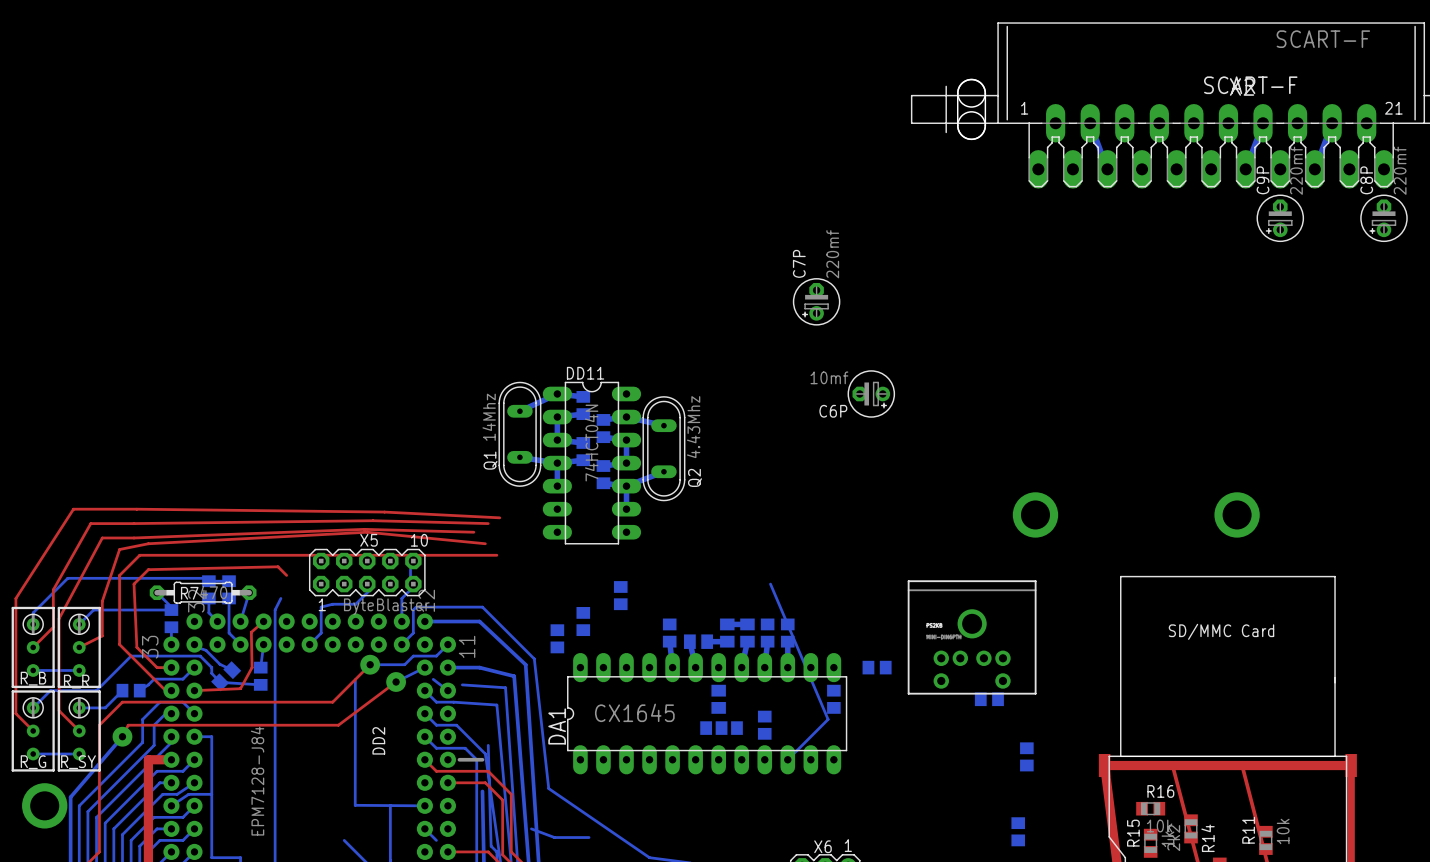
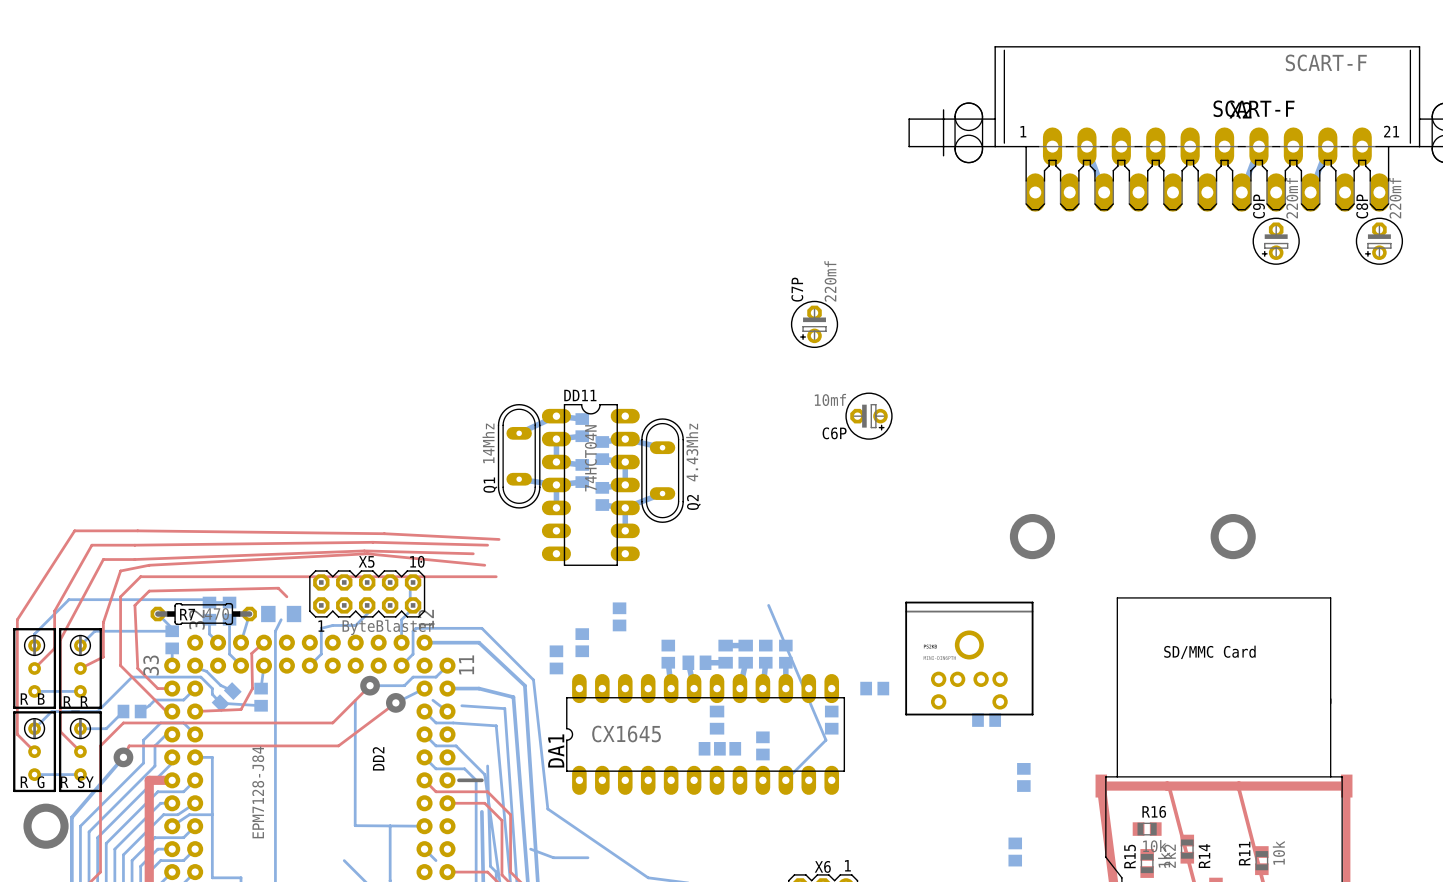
part: none -> (281, 614)

